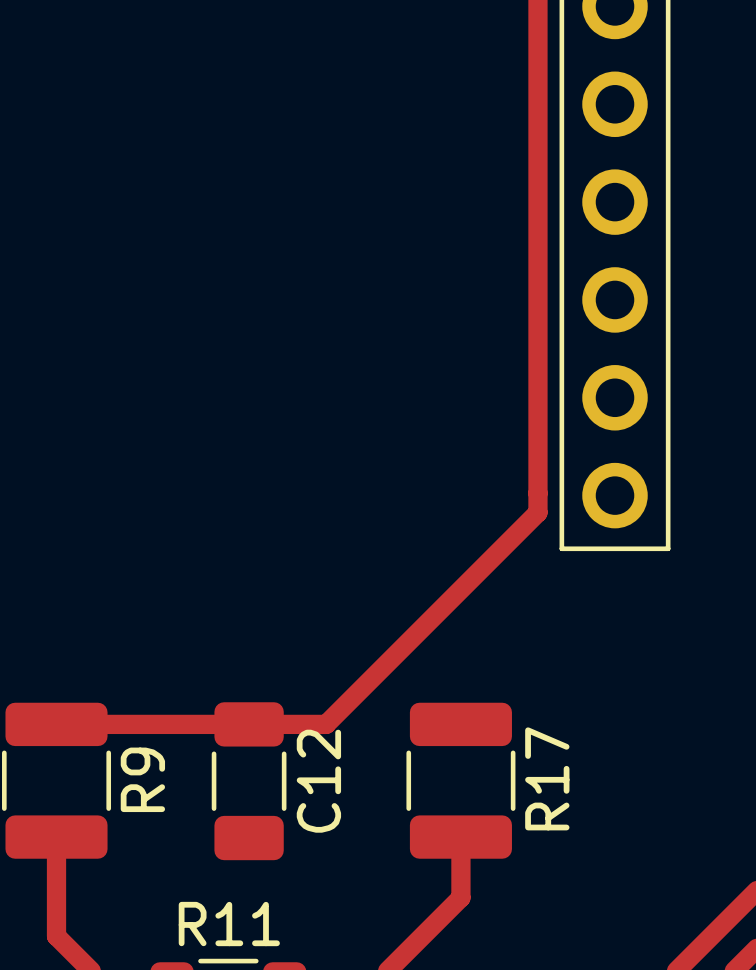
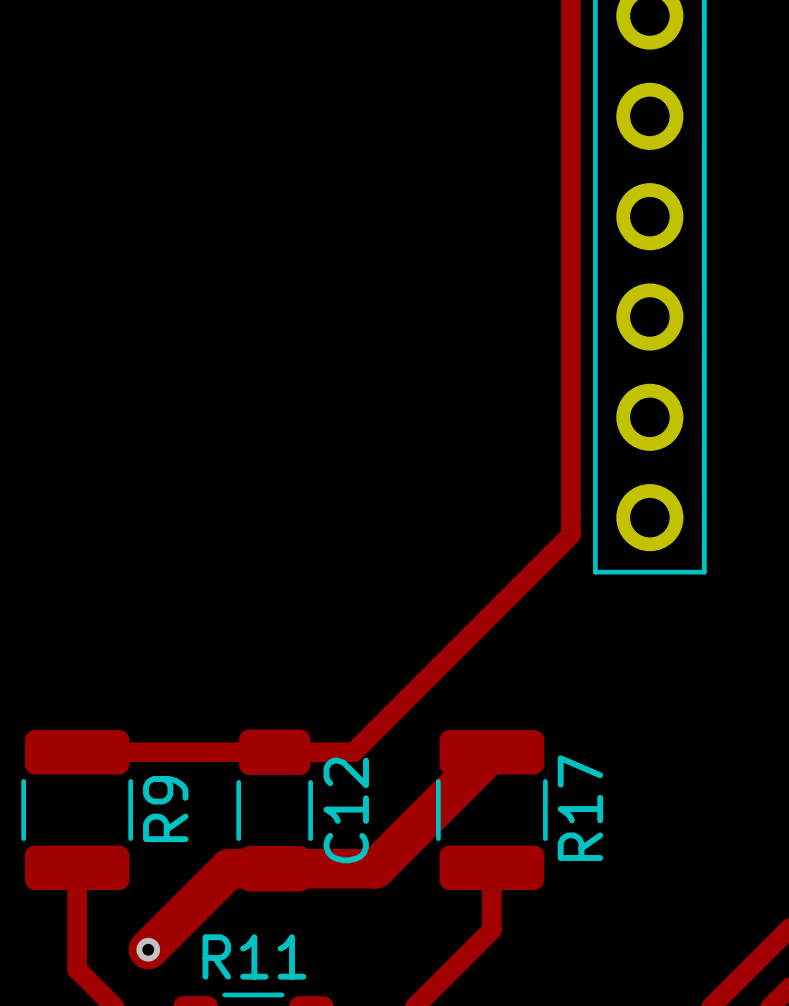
track: none -> (491, 752) (375, 868) (229, 868) (148, 949)
via: none -> (148, 949)

